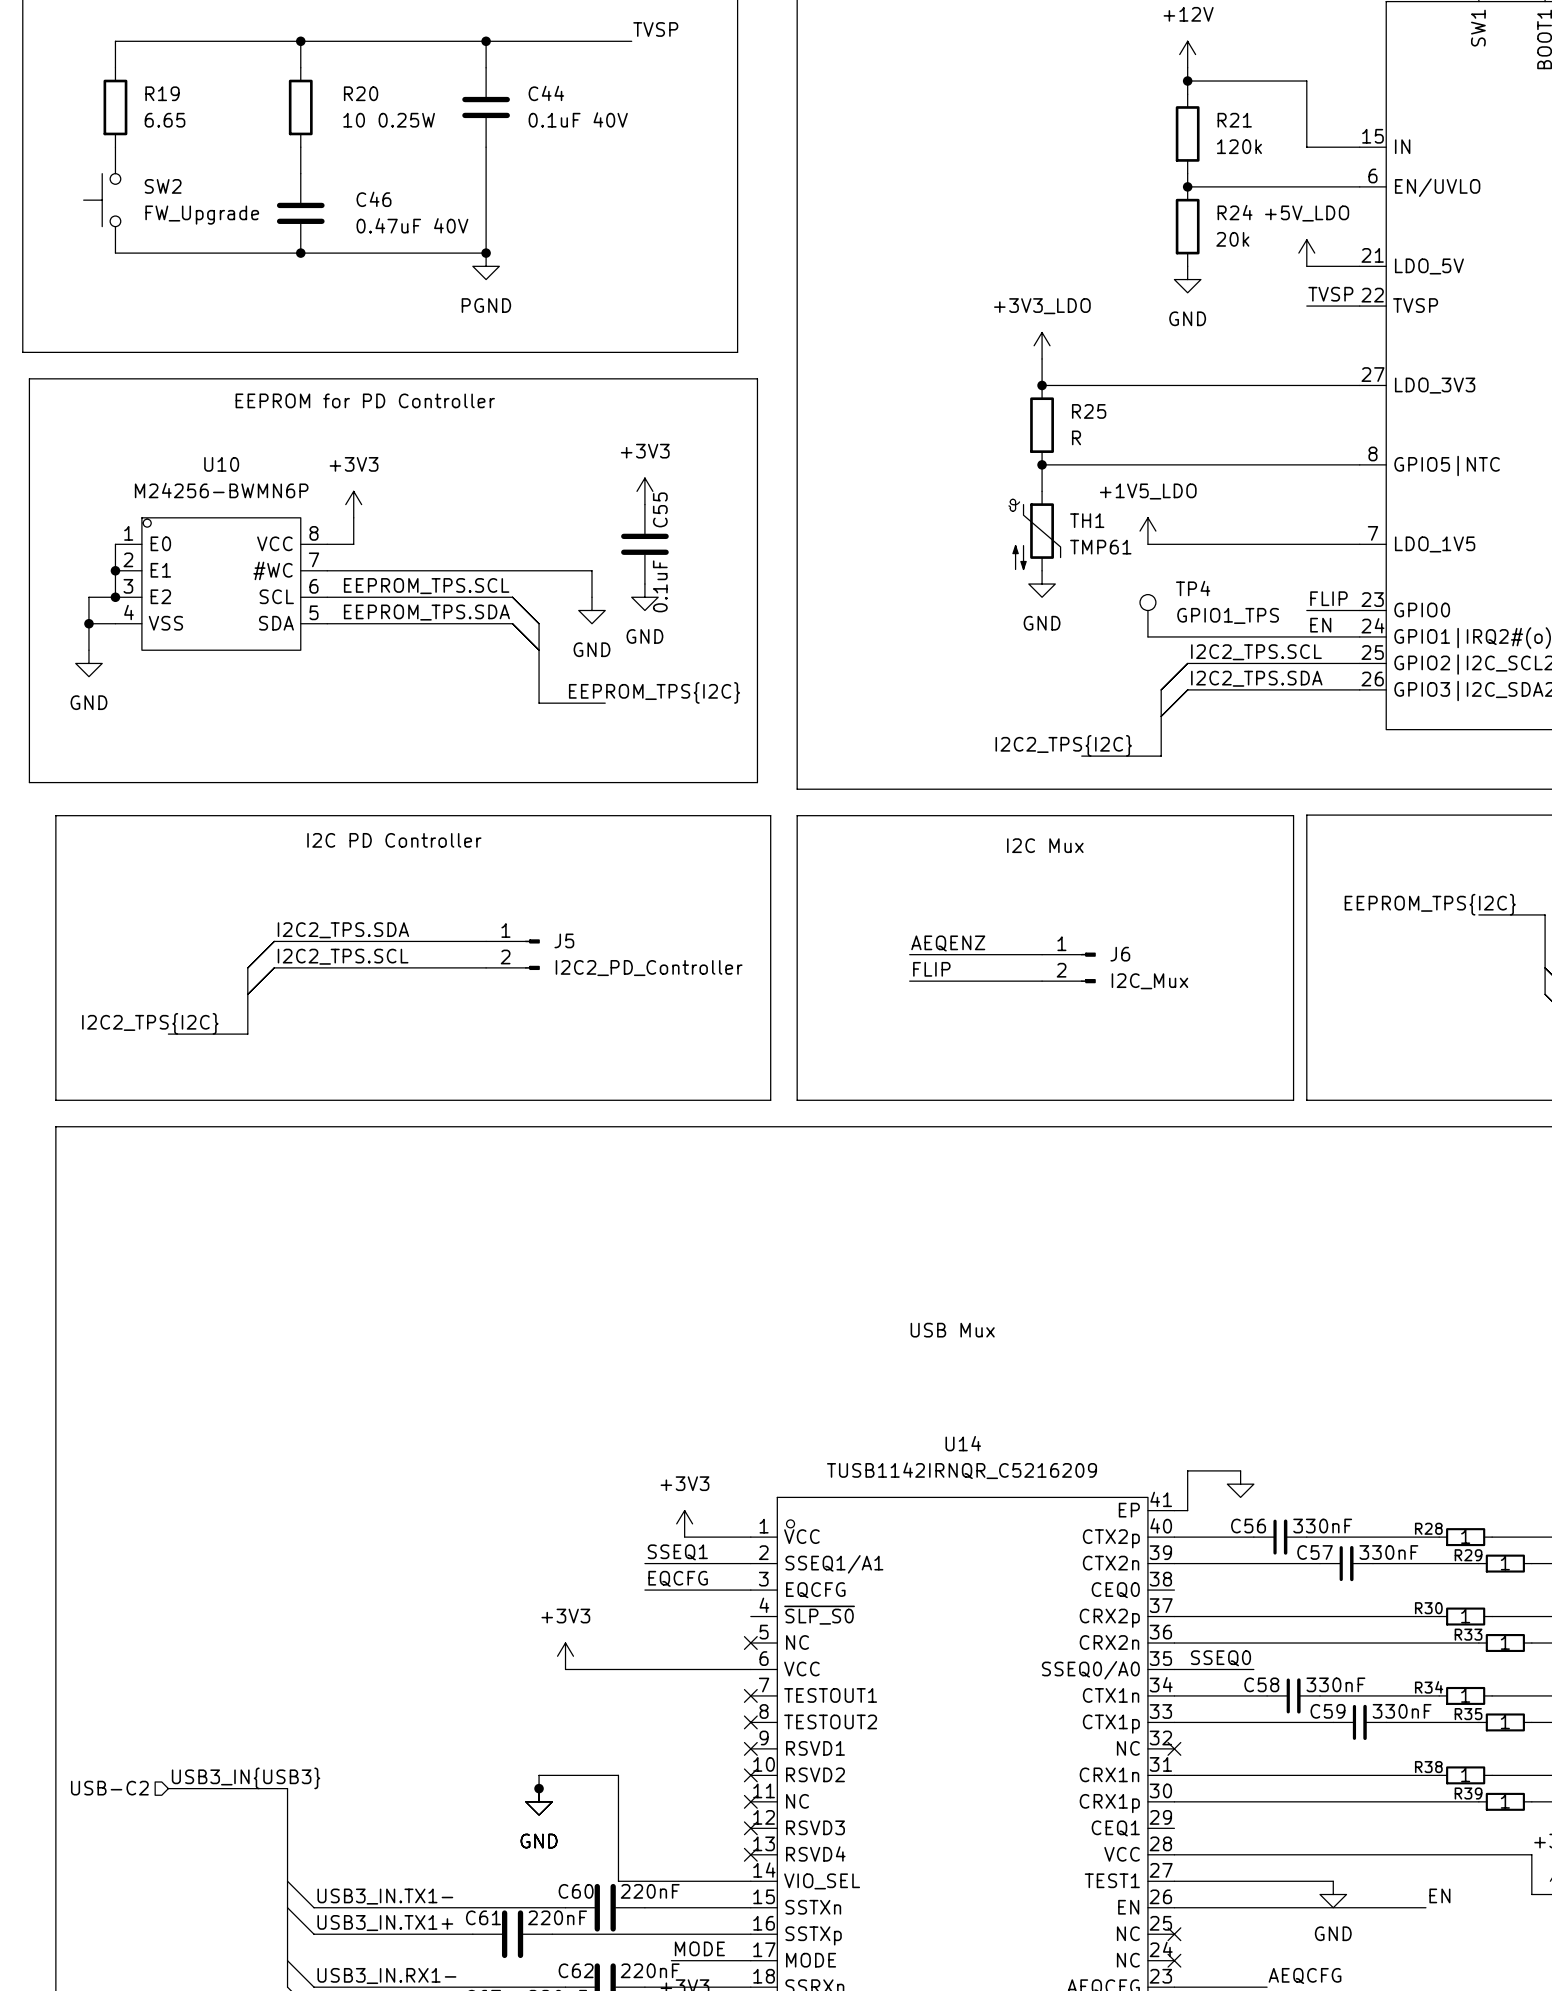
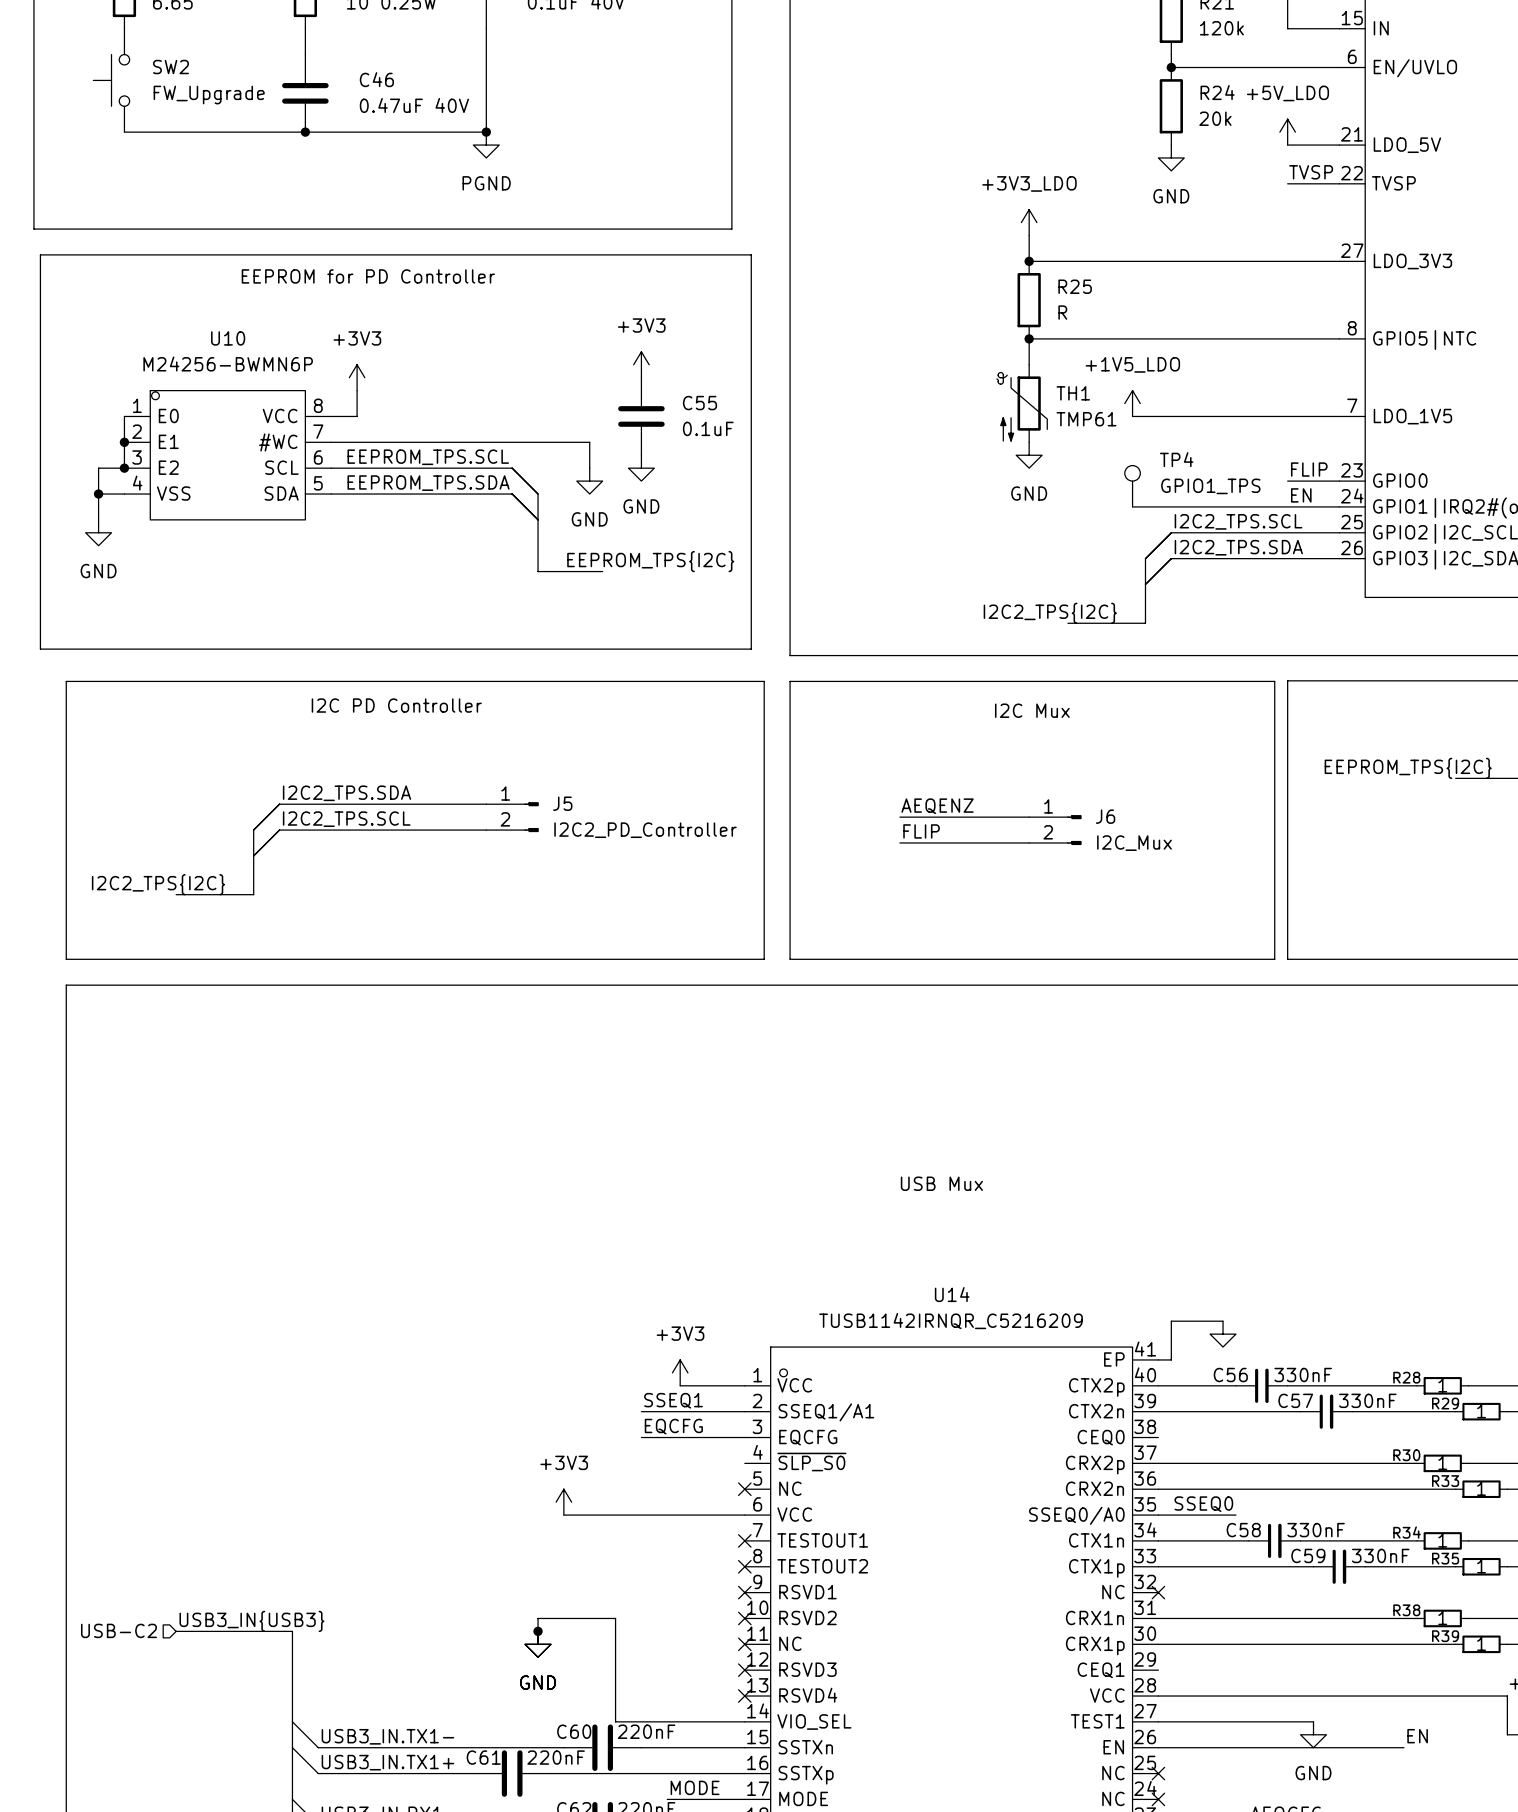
C55 name rotation: 0° (660, 509) -> 90° clockwise (699, 403)
C55 name position: C55 (660, 509) -> C55 (699, 403)
C55 value rotation: 0° (660, 586) -> 90° clockwise (708, 428)

